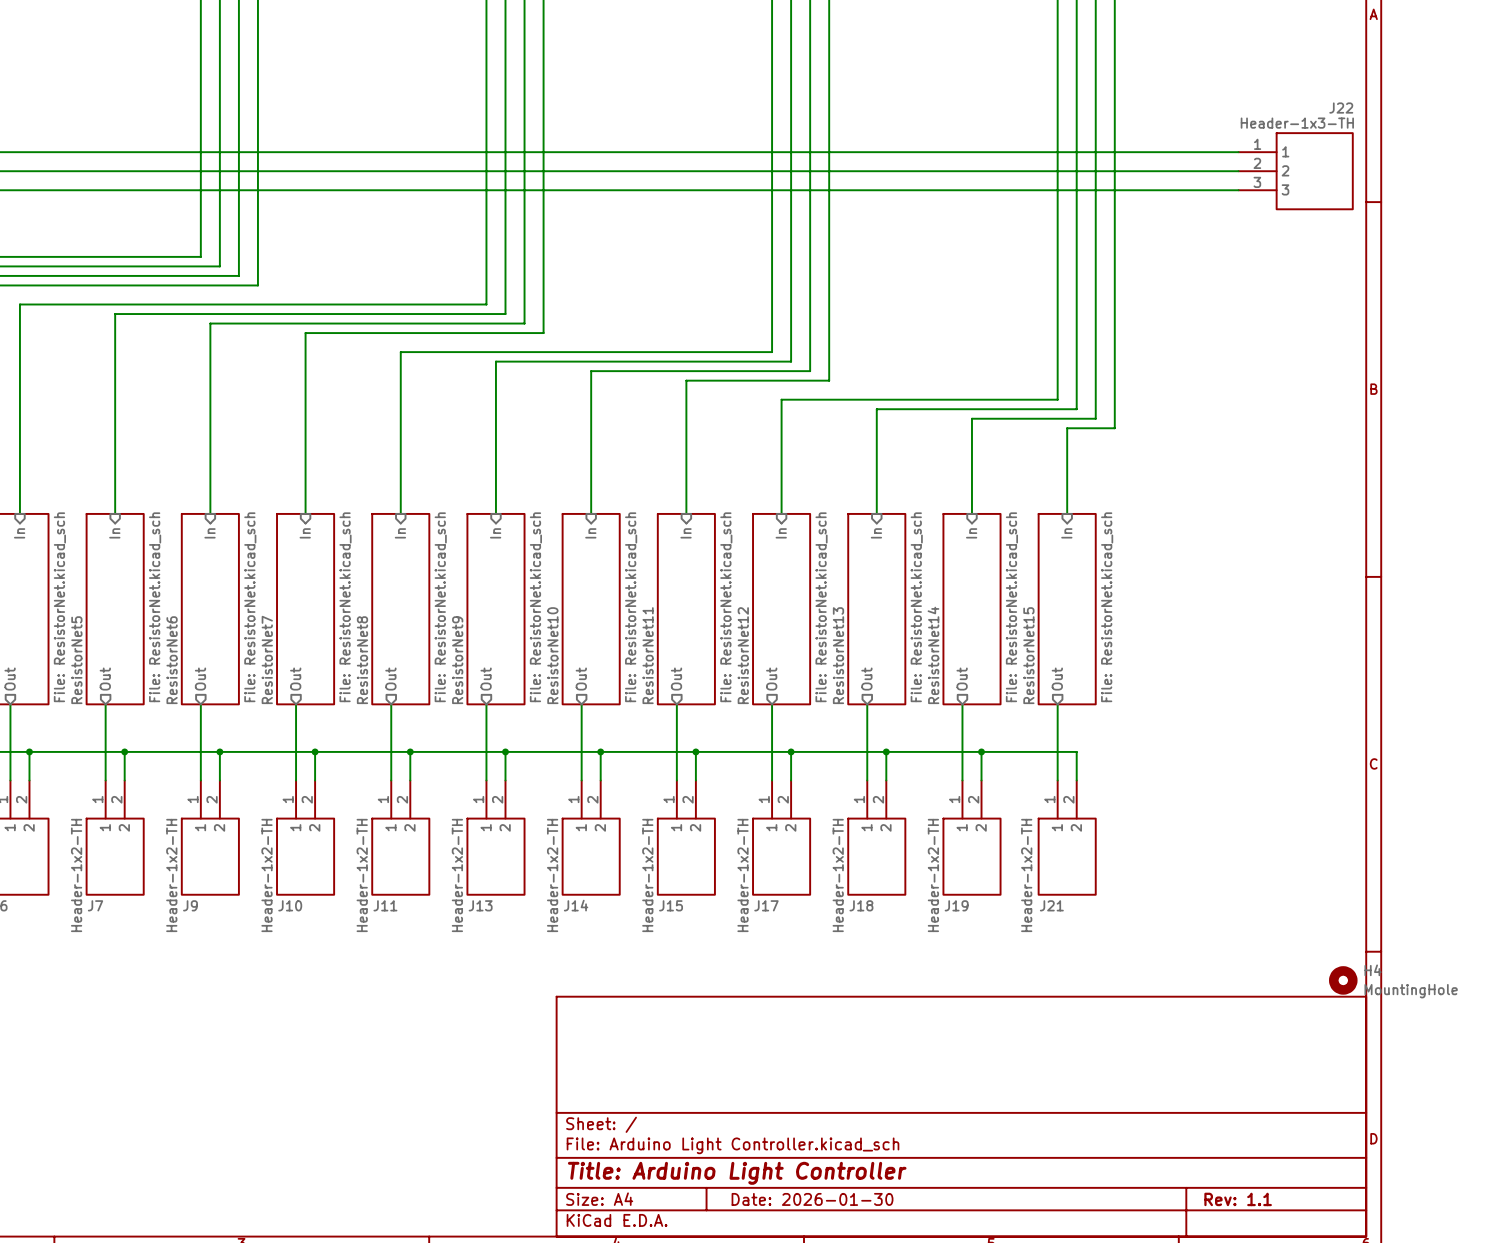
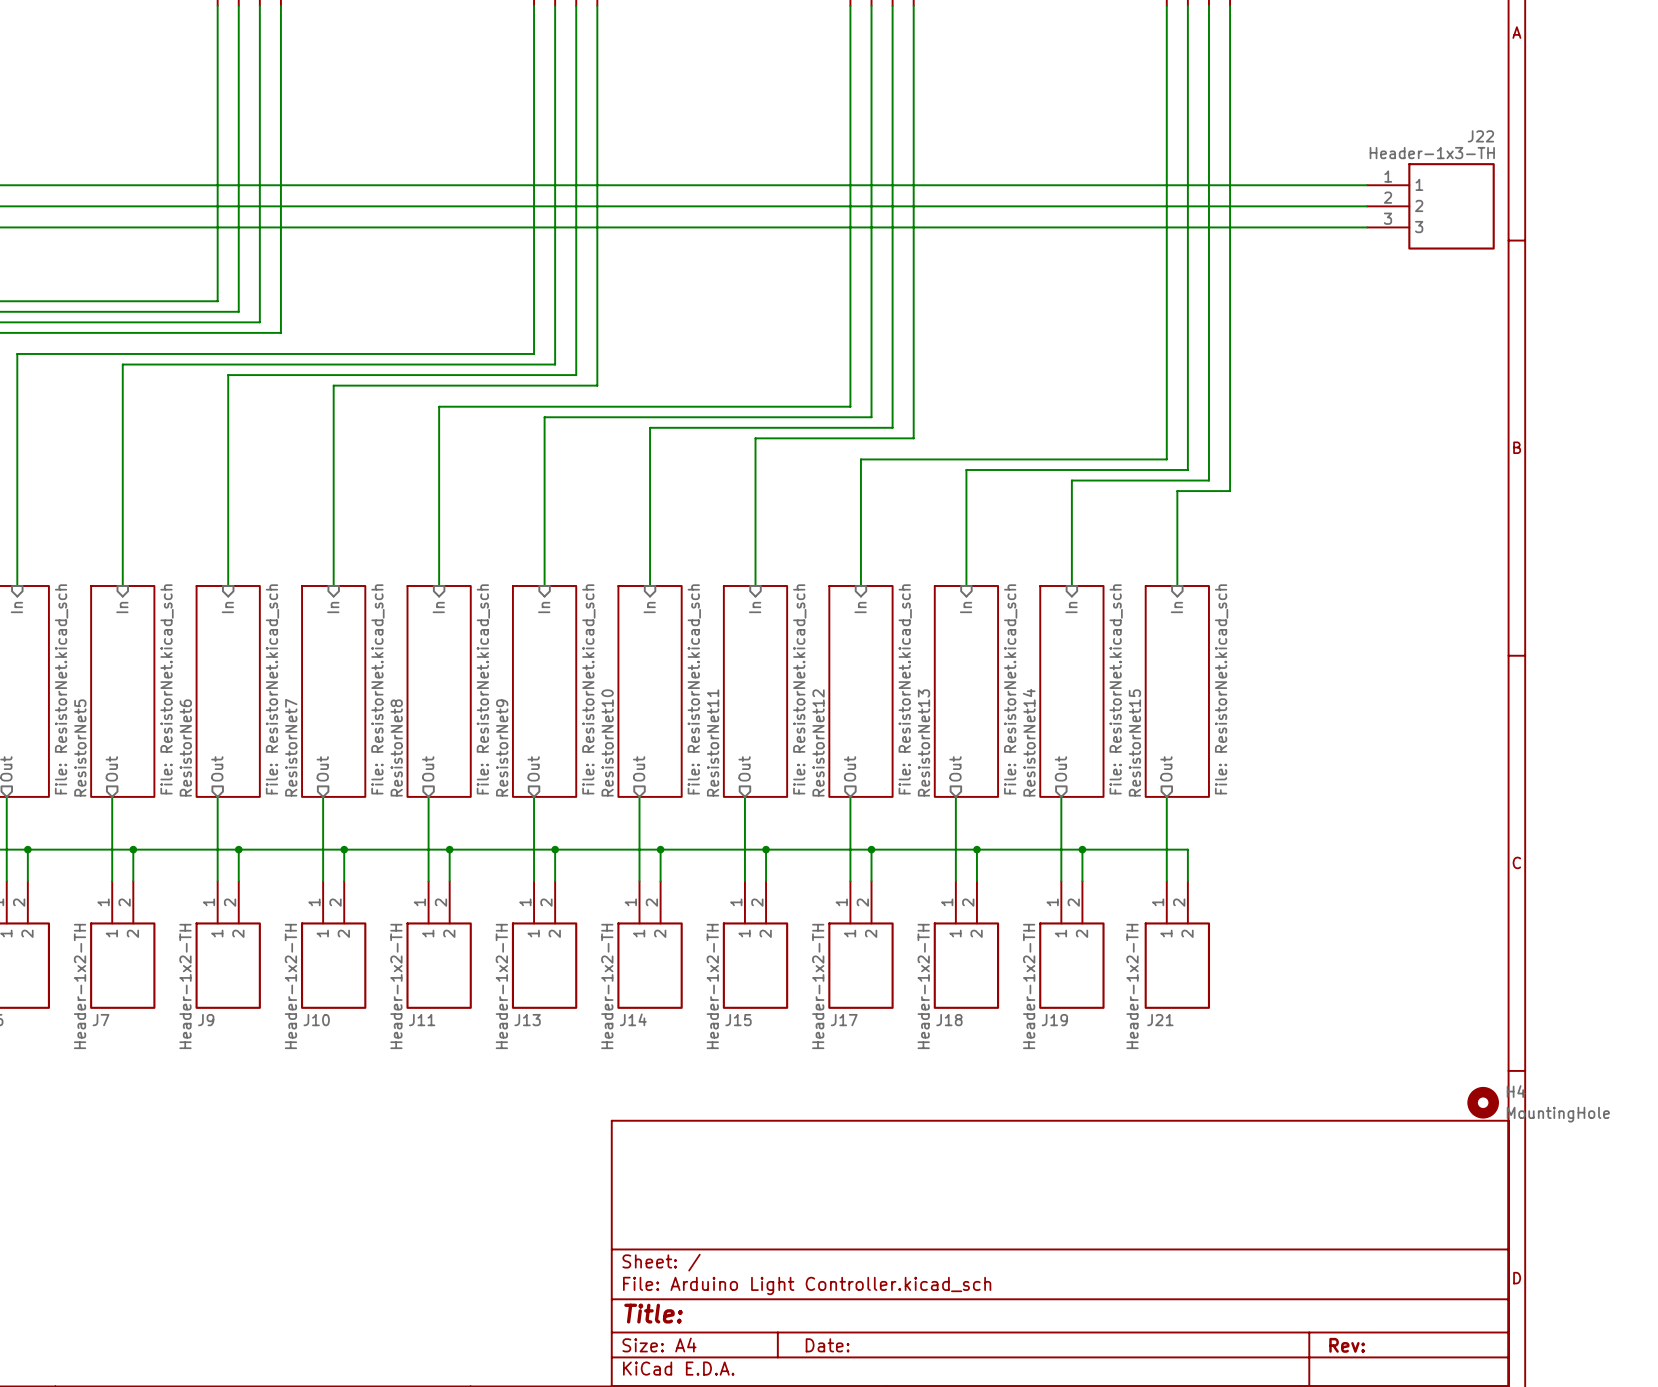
title block: Title: Arduino Light Controller (737, 1173) -> Title: (653, 1313)
title block: Date: 2026-01-30 (812, 1199) -> Date: (827, 1345)
title block: Rev: 1.1 (1238, 1199) -> Rev: (1347, 1345)

